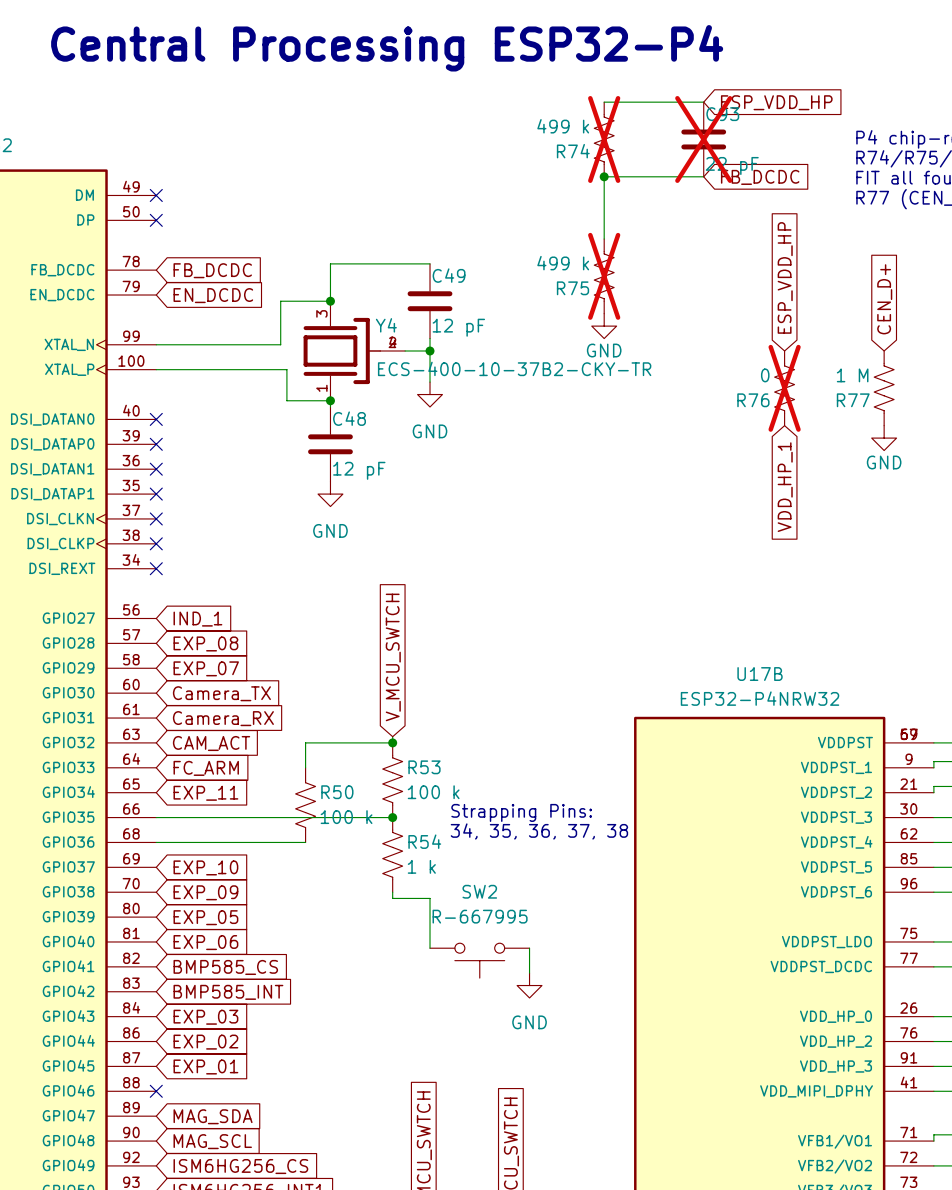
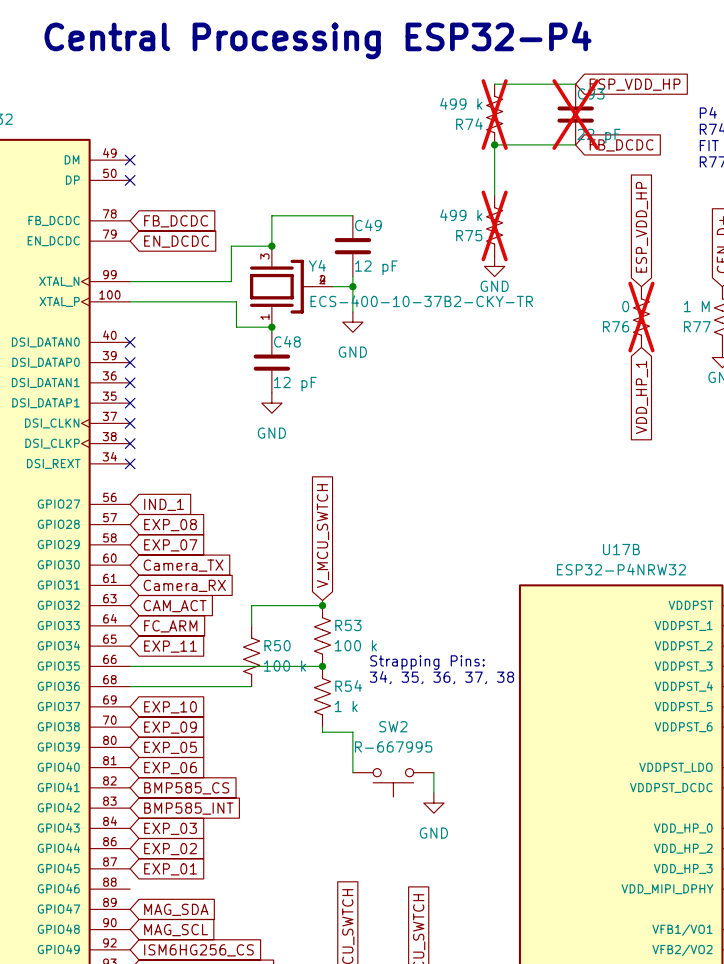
no-connect mark: (156, 1091) -> none

